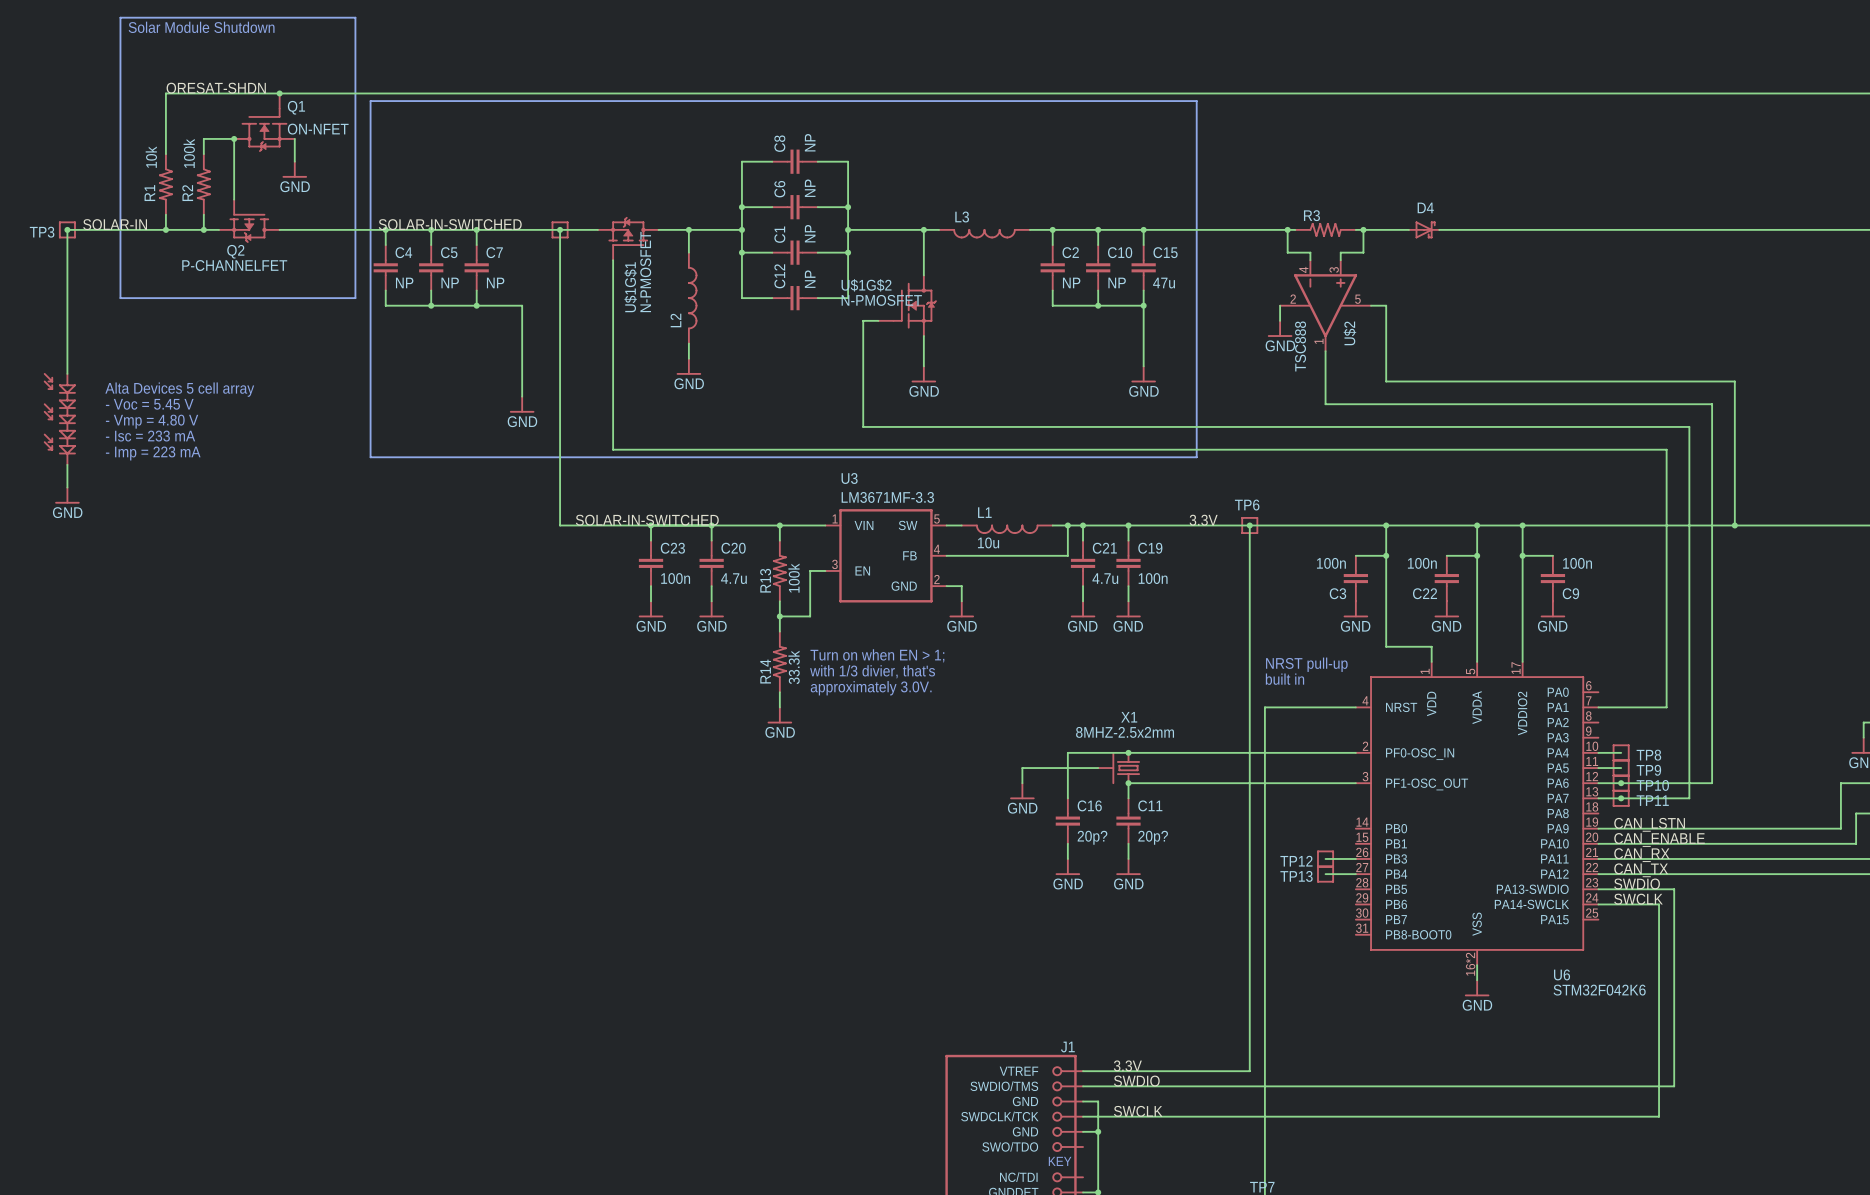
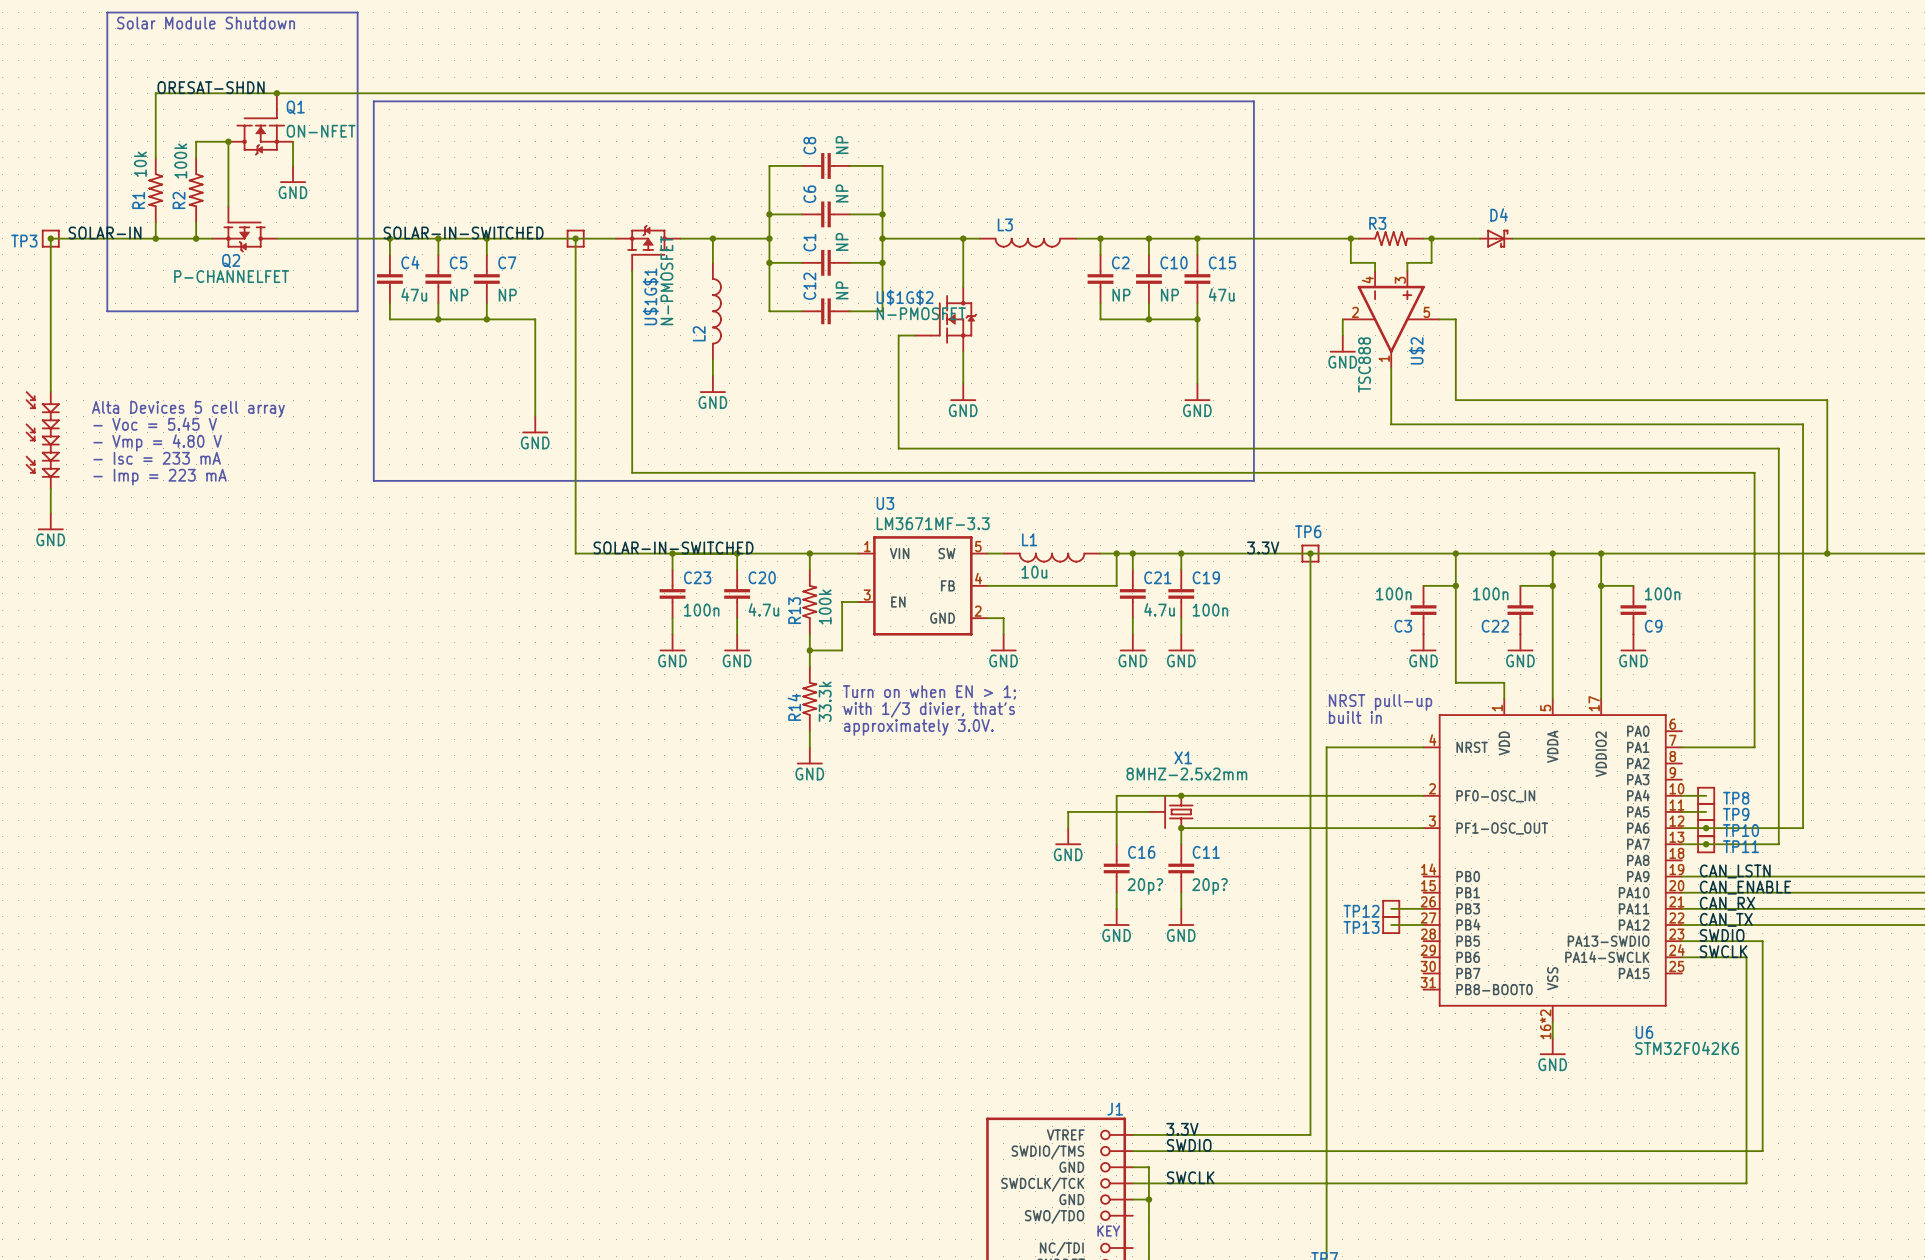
C4 value: NP (404, 282) -> 47u (414, 294)

